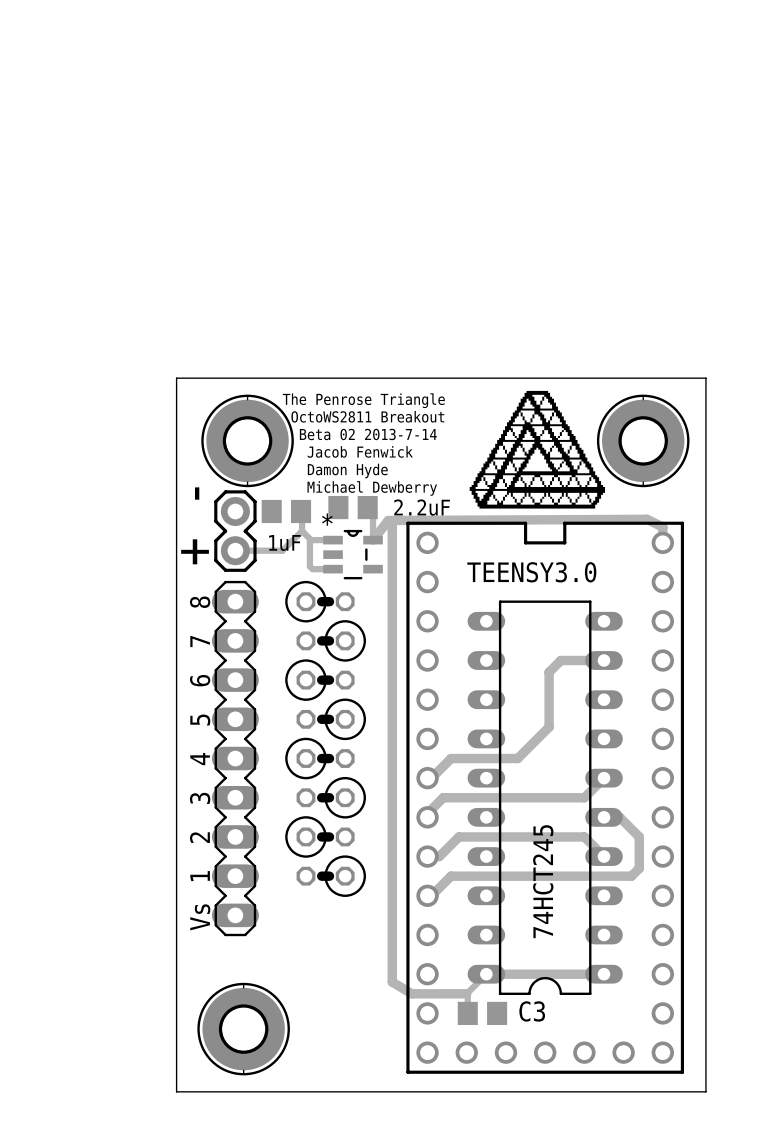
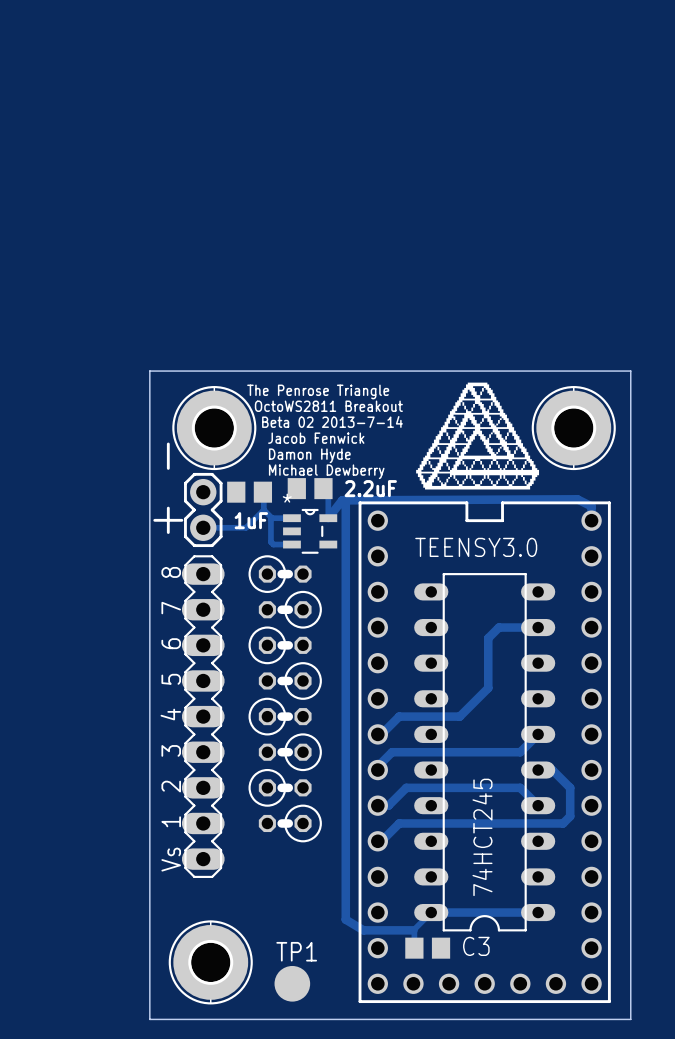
TP1: none -> (292, 983)

